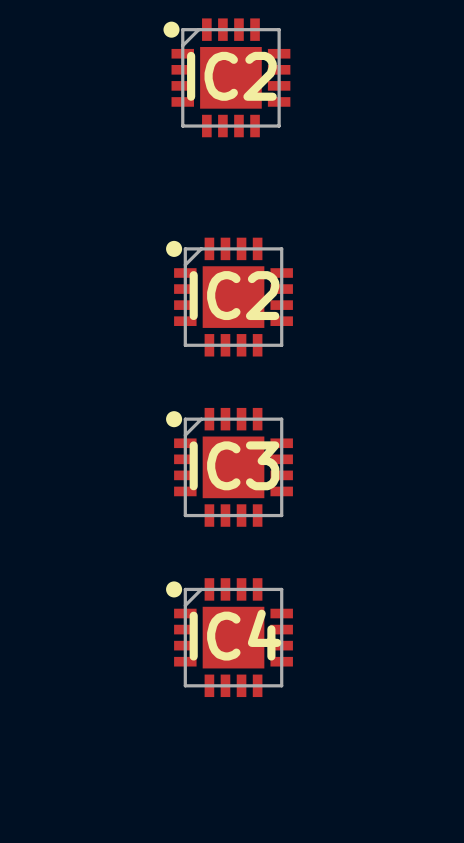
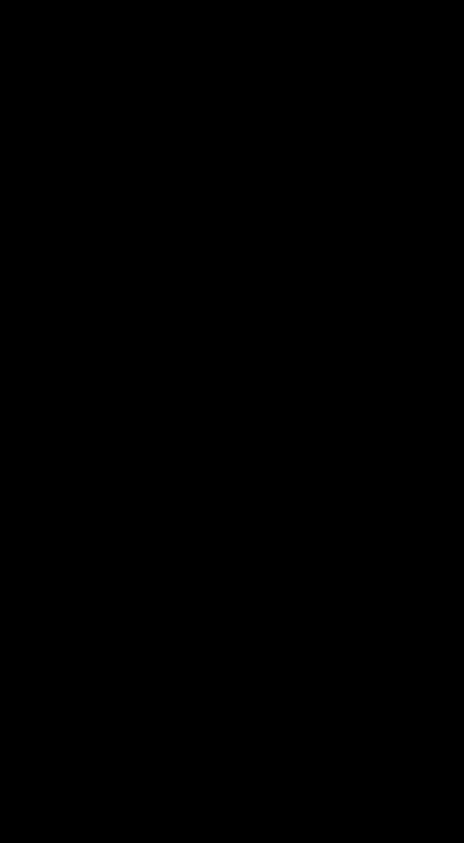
IC2: (226, 77) -> none
IC2: (229, 297) -> none
IC3: (229, 467) -> none
IC4: (229, 637) -> none

